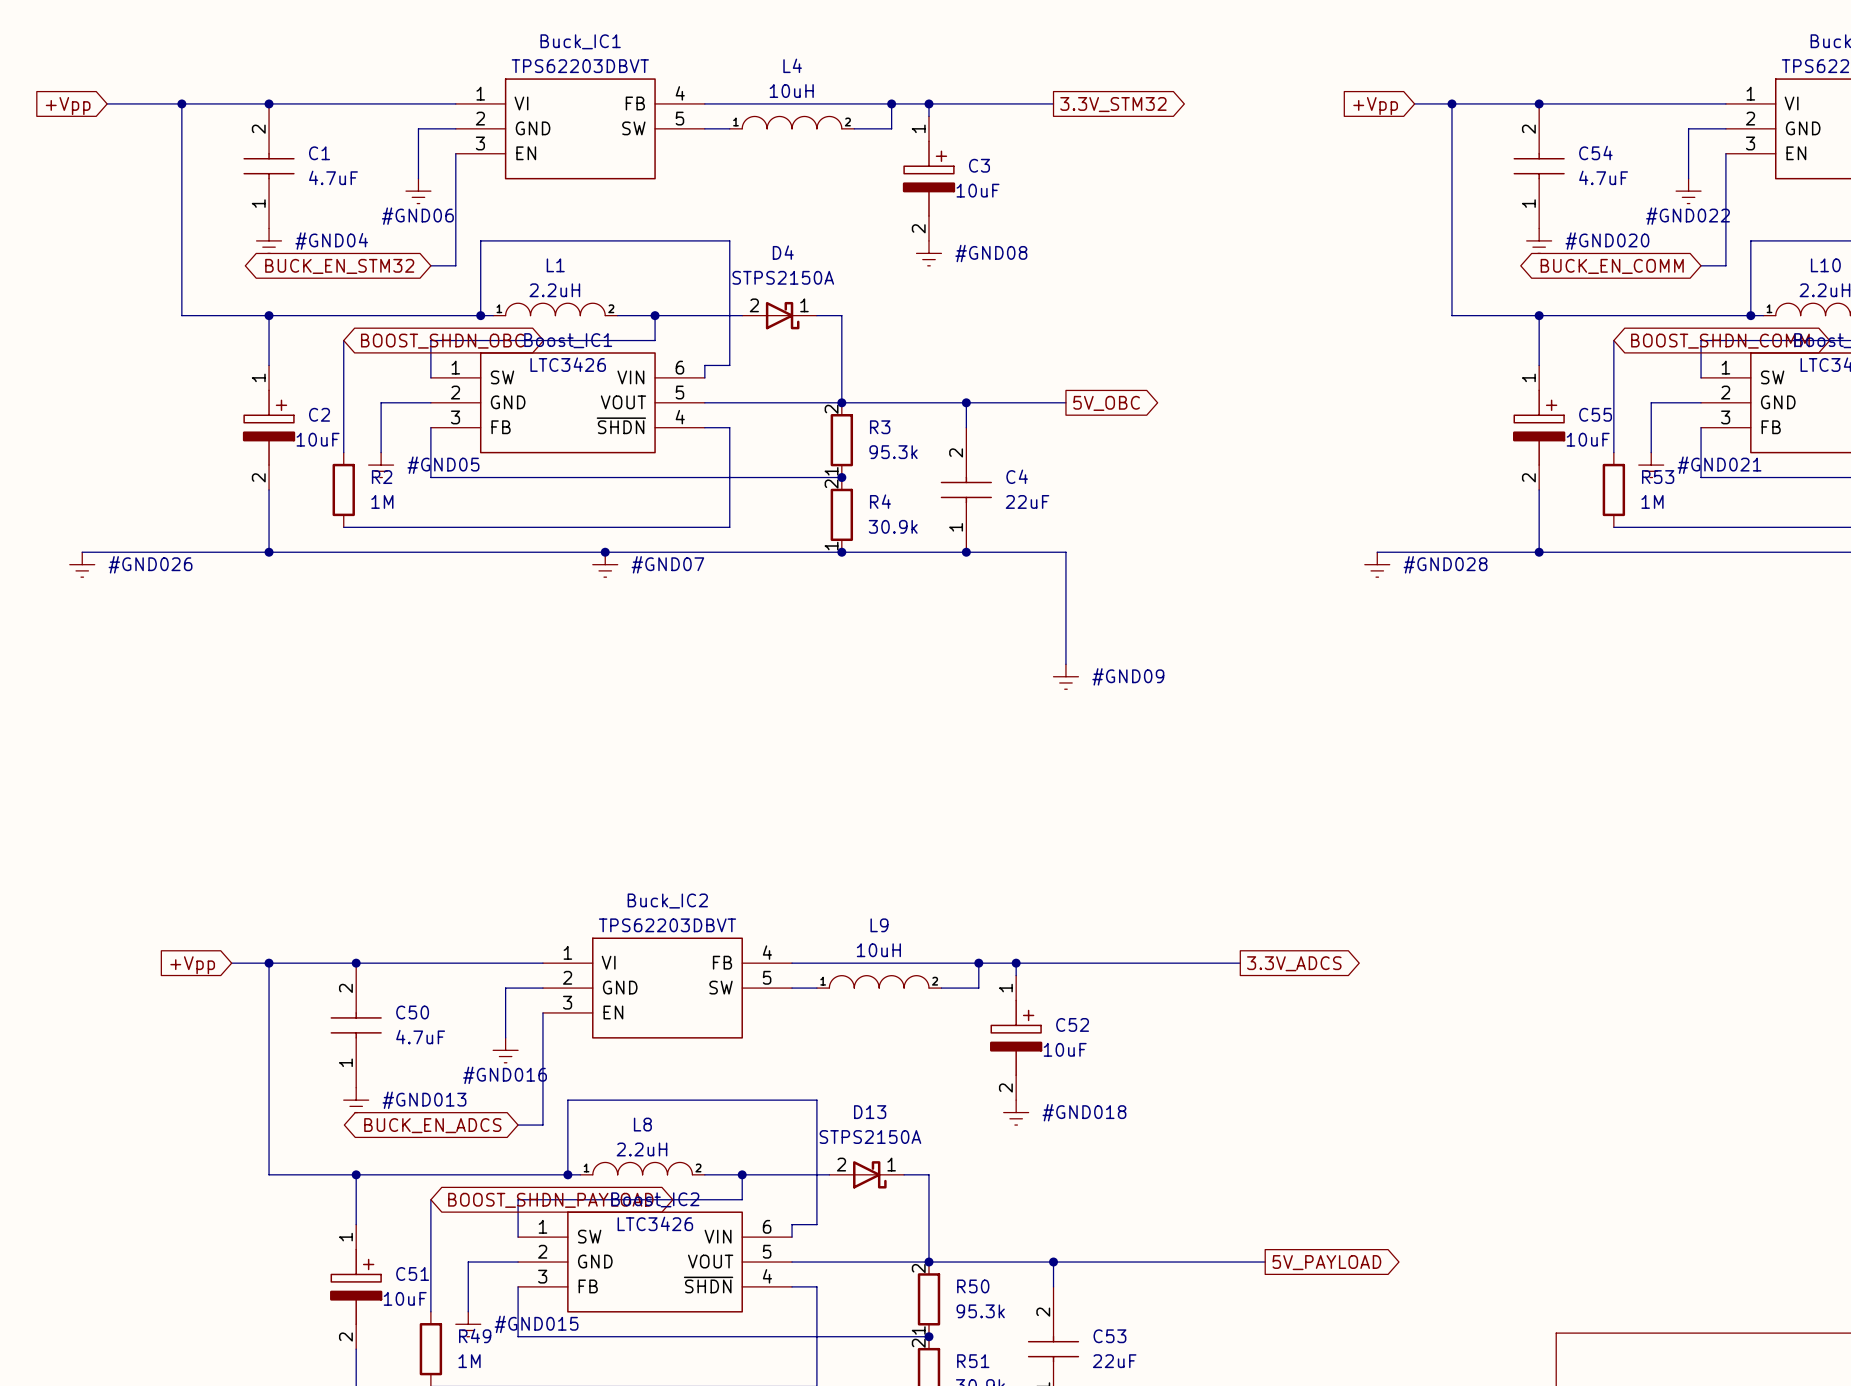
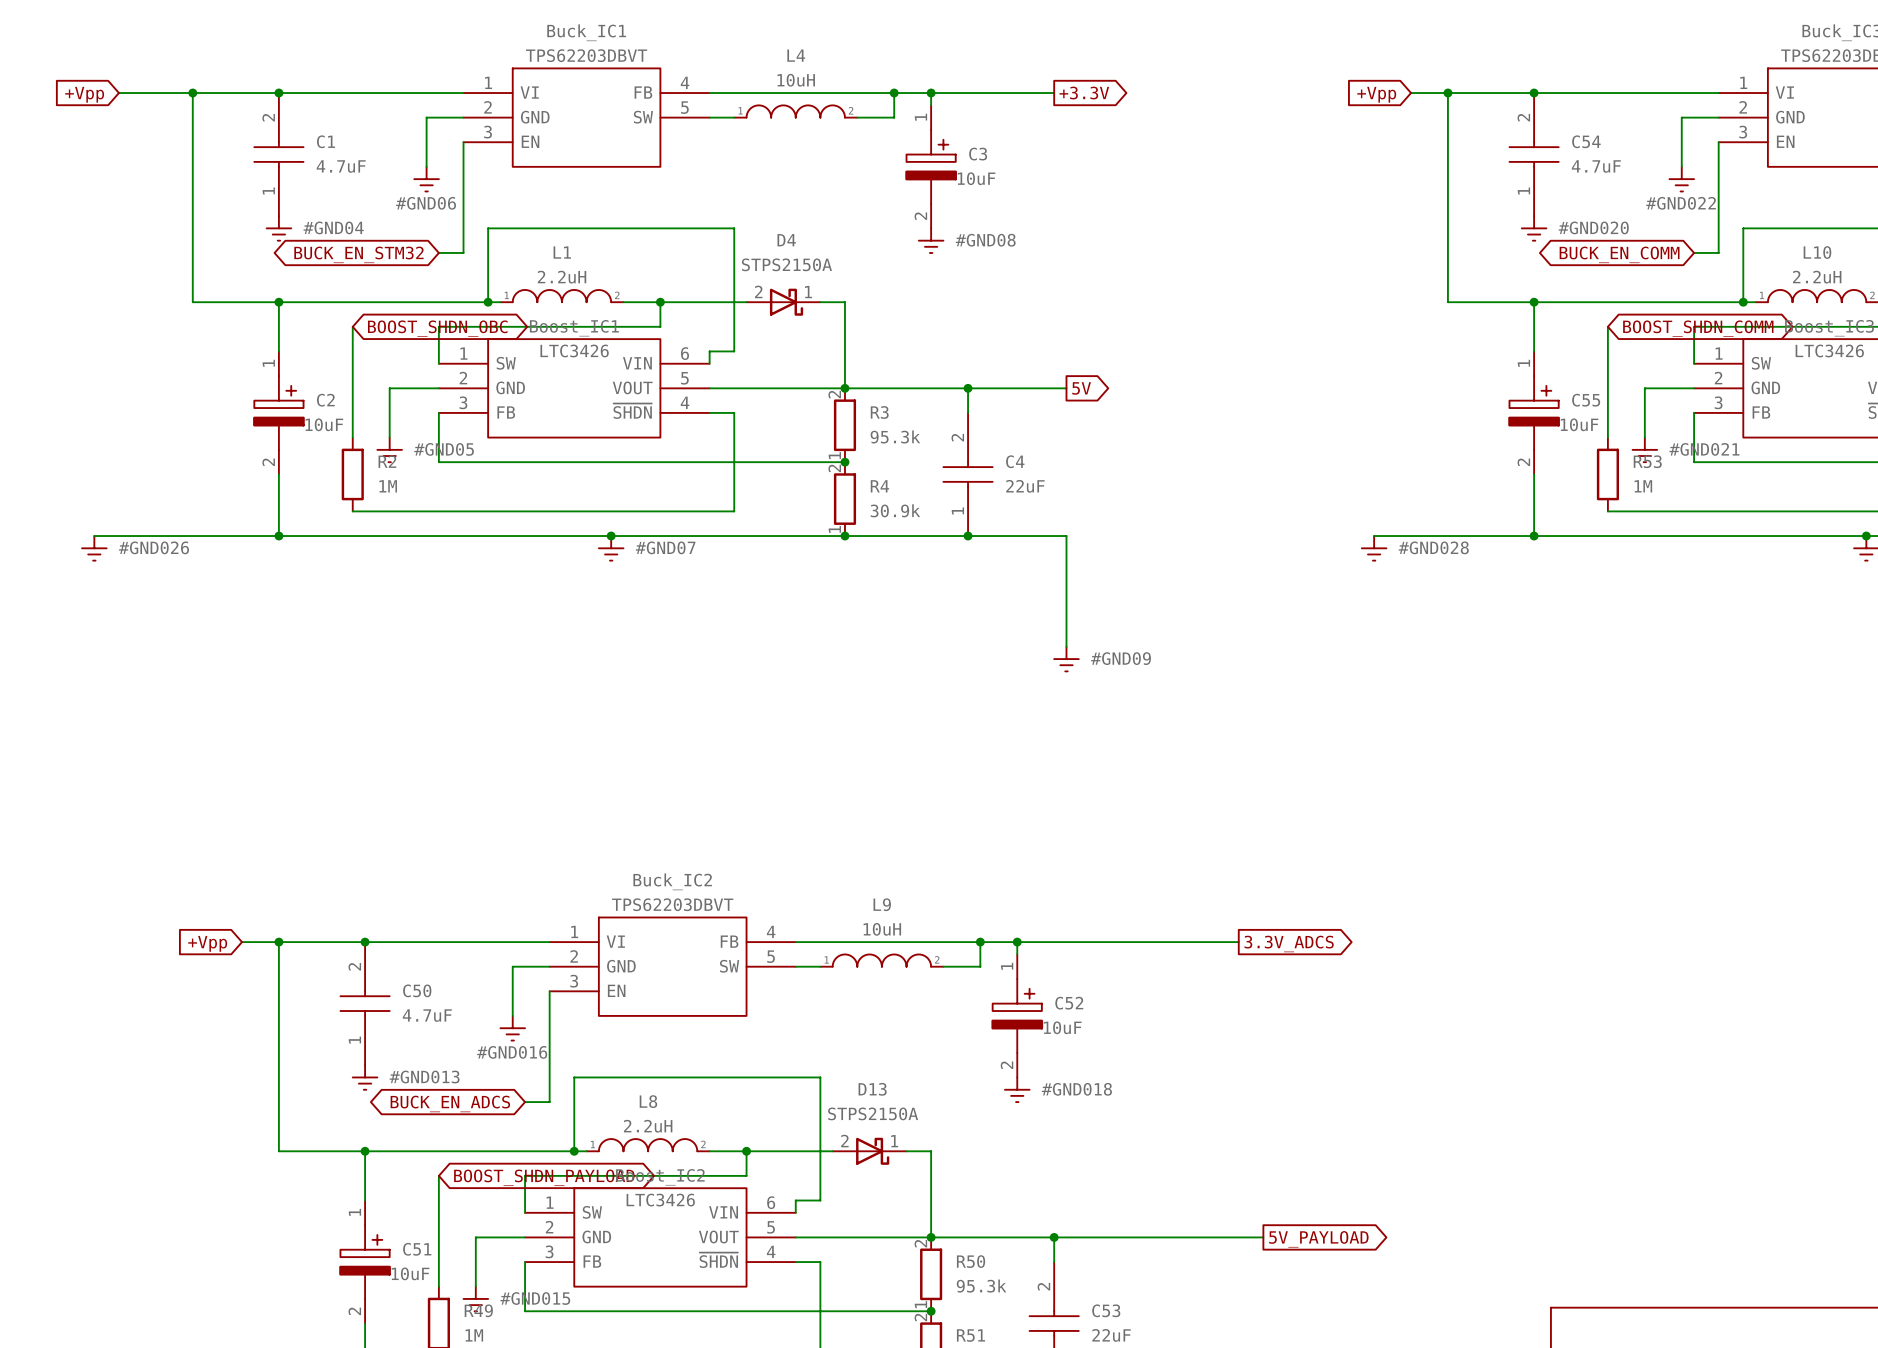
global label: 3.3V_STM32 (1113, 104) -> +3.3V (1084, 93)
global label: 5V_OBC (1106, 403) -> 5V (1081, 388)

